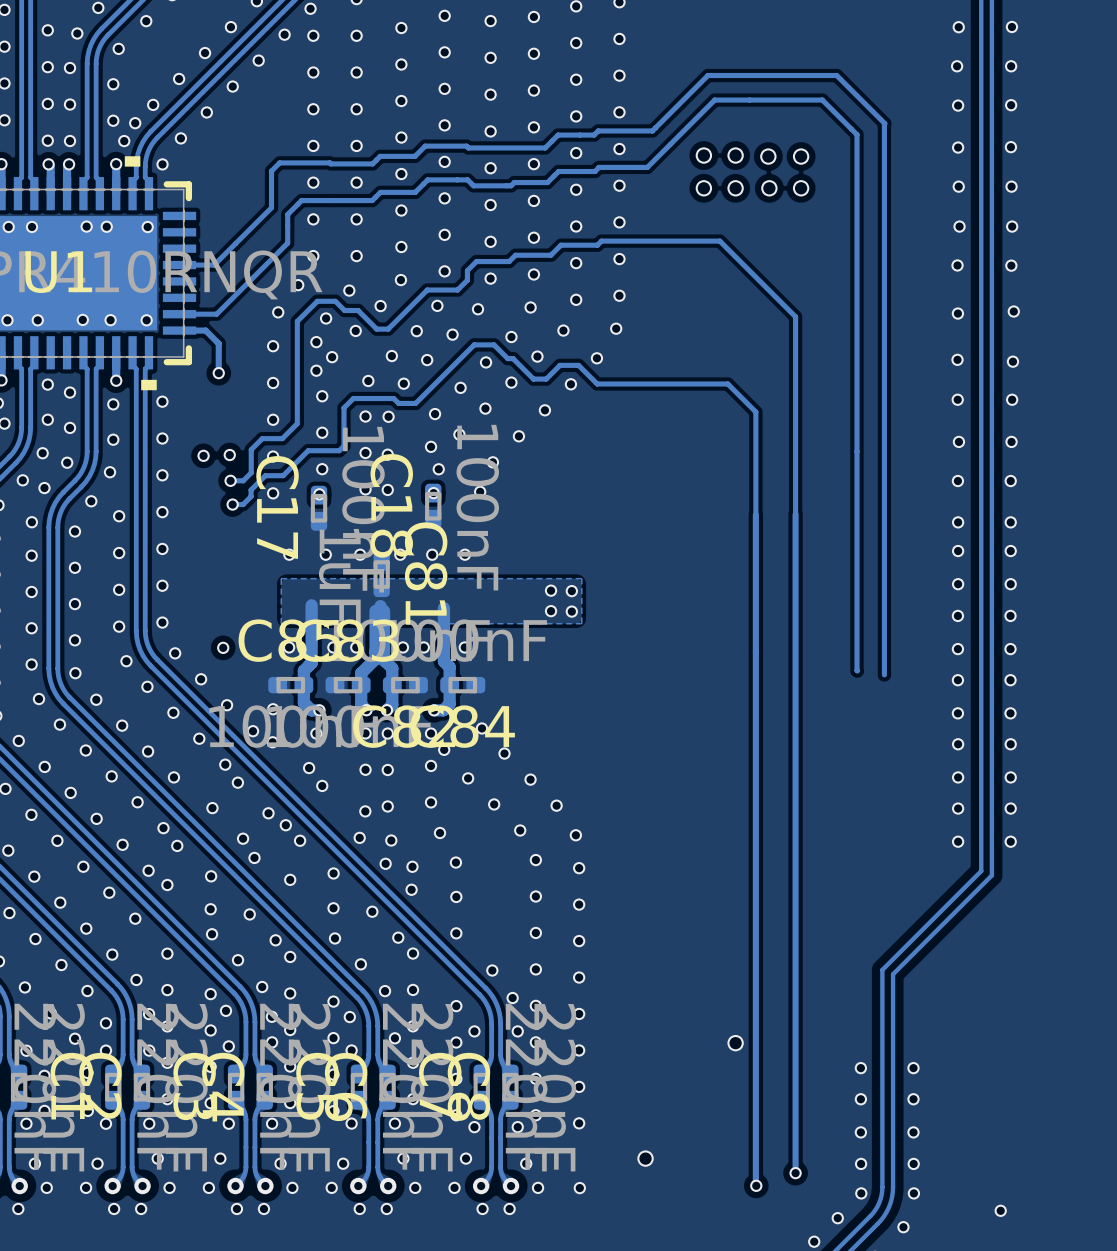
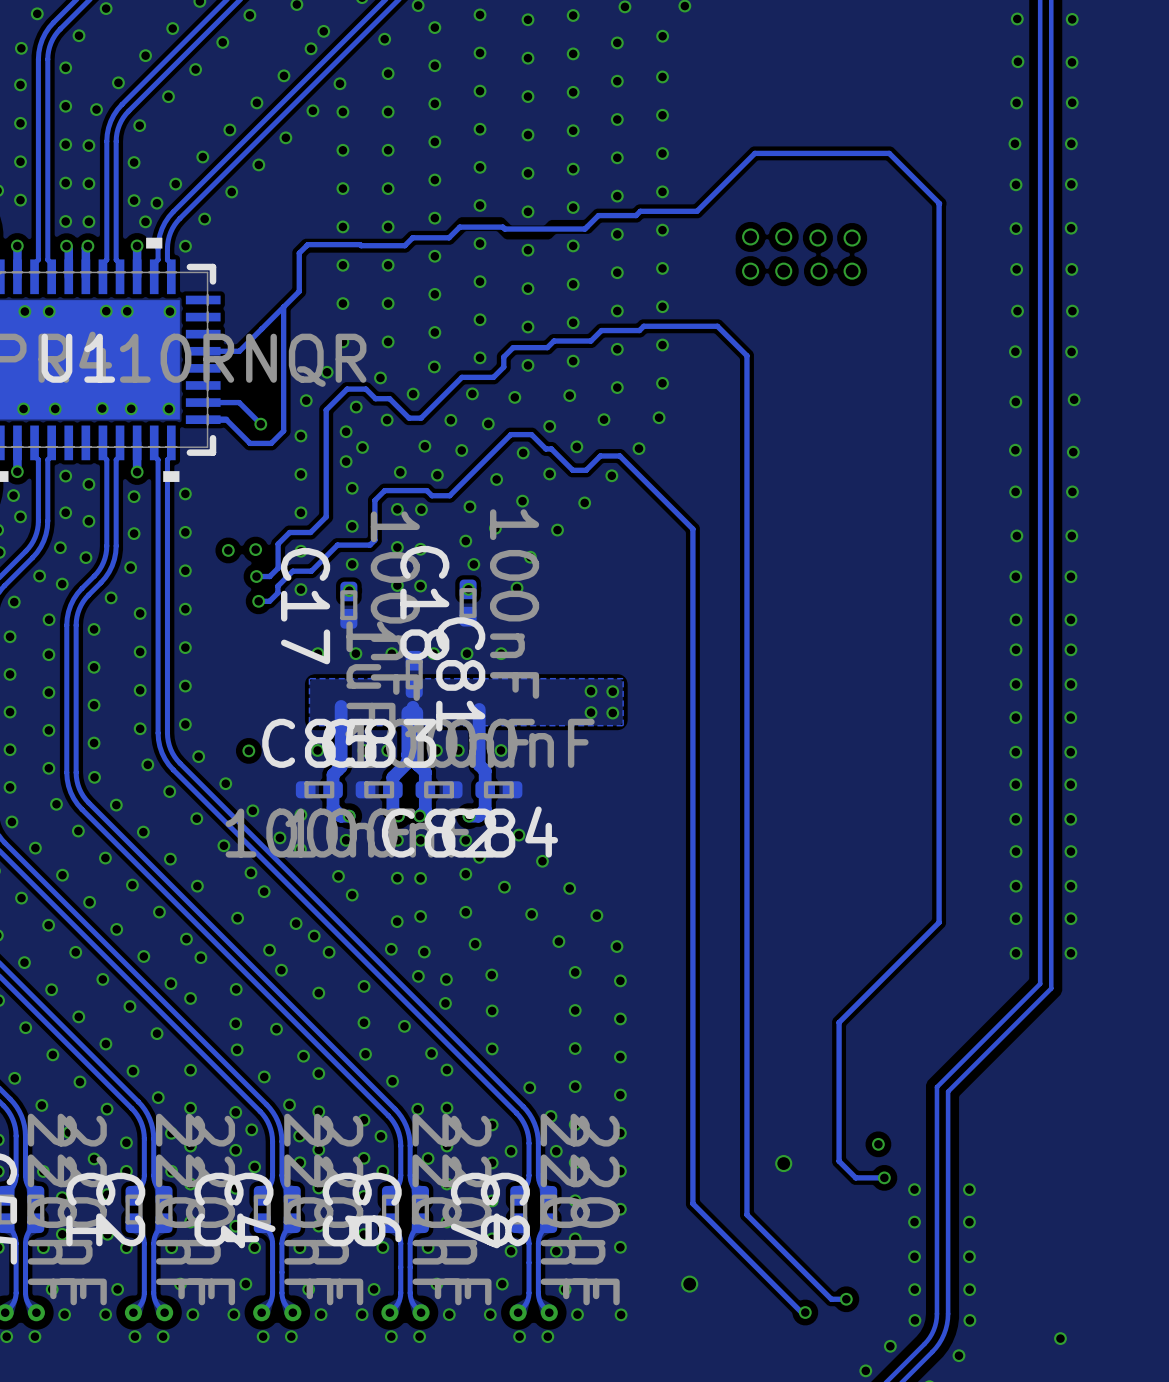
track: (672, 241) (719, 241) (795, 316) (795, 1173) -> (717, 326) (746, 355) (746, 1214) (831, 1299) (846, 1299)
track: (214, 314) (216, 314) (287, 243) (287, 214) (301, 200) (372, 200) (380, 192) (415, 192) (427, 179) (467, 179) (473, 185) (511, 185) (514, 182) (547, 182) (558, 171) (594, 171) (599, 167) (647, 167) (714, 100) (822, 100) (856, 134) (856, 670) -> (239, 402) (260, 424)
track: (201, 330) (205, 330) (218, 343) (218, 373) -> (226, 419) (250, 443) (271, 443) (283, 430) (283, 307)
via position: (218, 373) -> (260, 424)
track: (597, 383) (727, 383) (755, 412) (755, 1185) -> (639, 475) (692, 529) (692, 1203) (801, 1312) (805, 1312)
track: none -> (939, 779) (939, 922) (839, 1022) (839, 1161) (855, 1177) (884, 1177)
via: none -> (878, 1144)
via: none -> (884, 1177)

